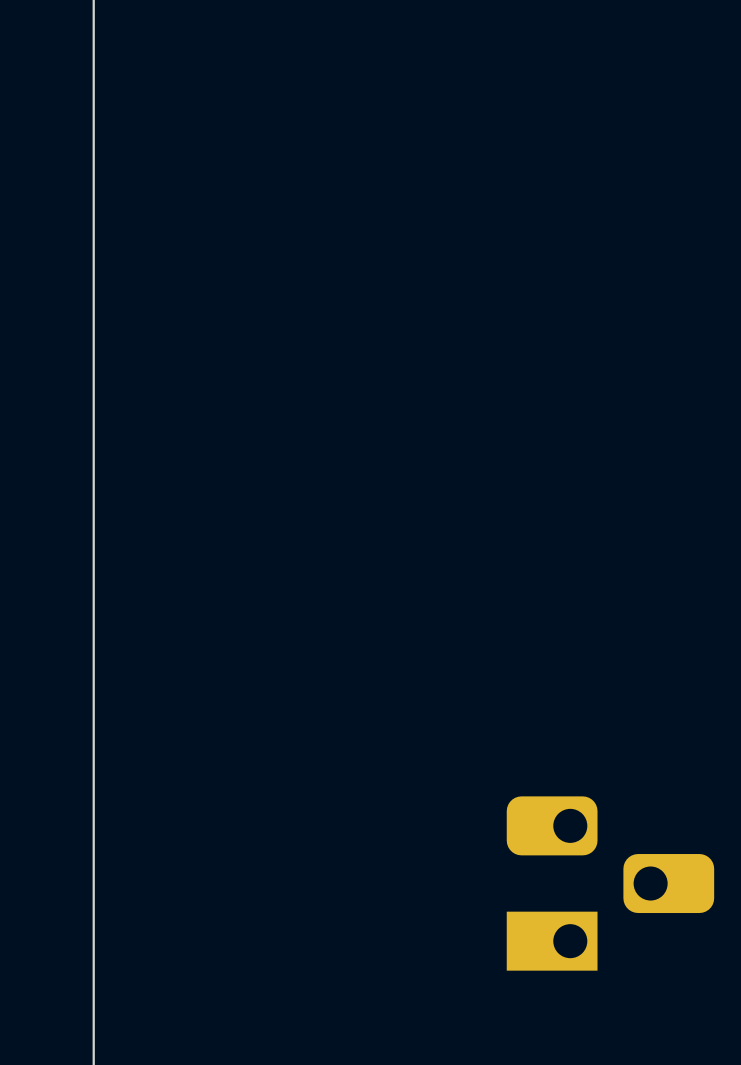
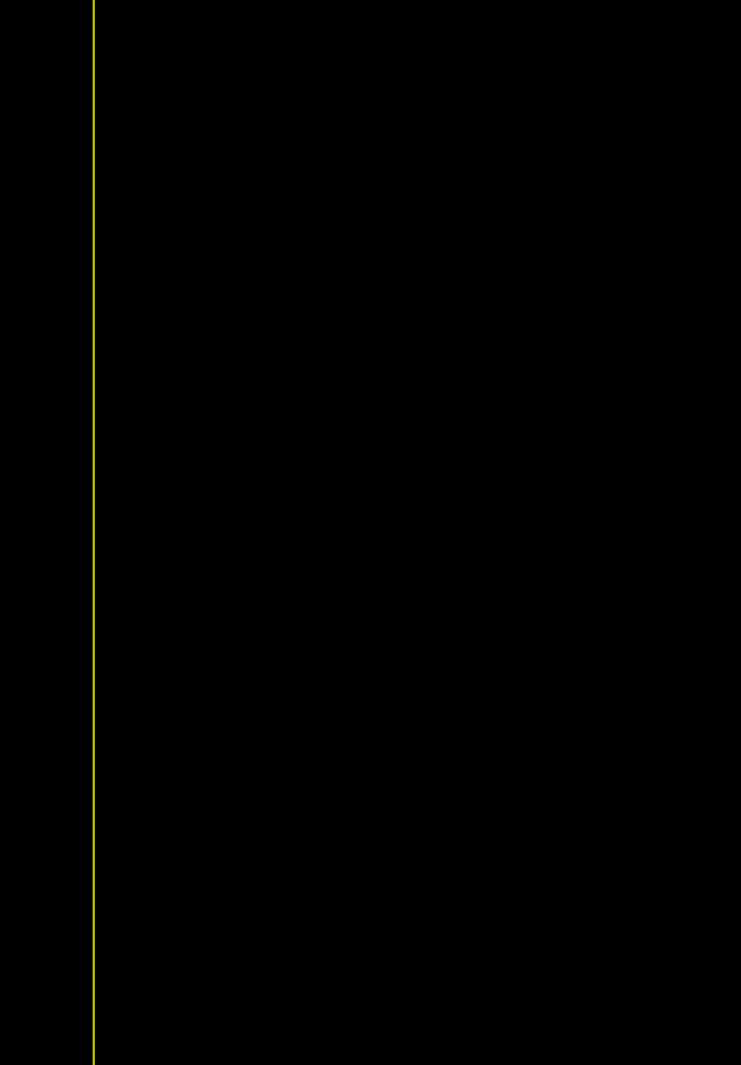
part: (610, 883) -> none

